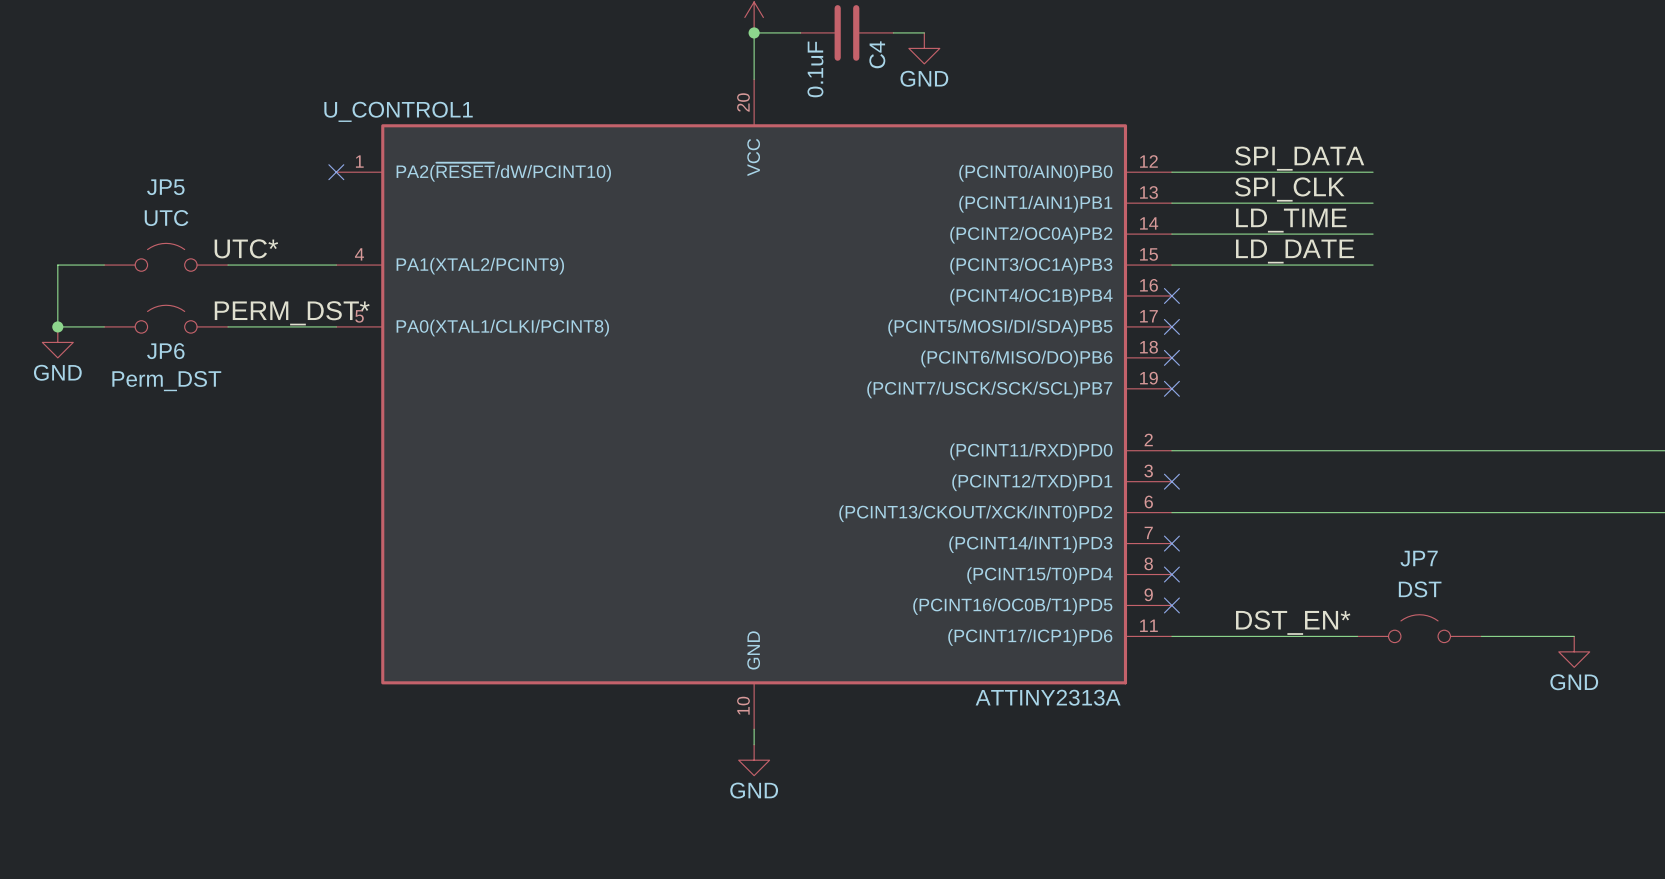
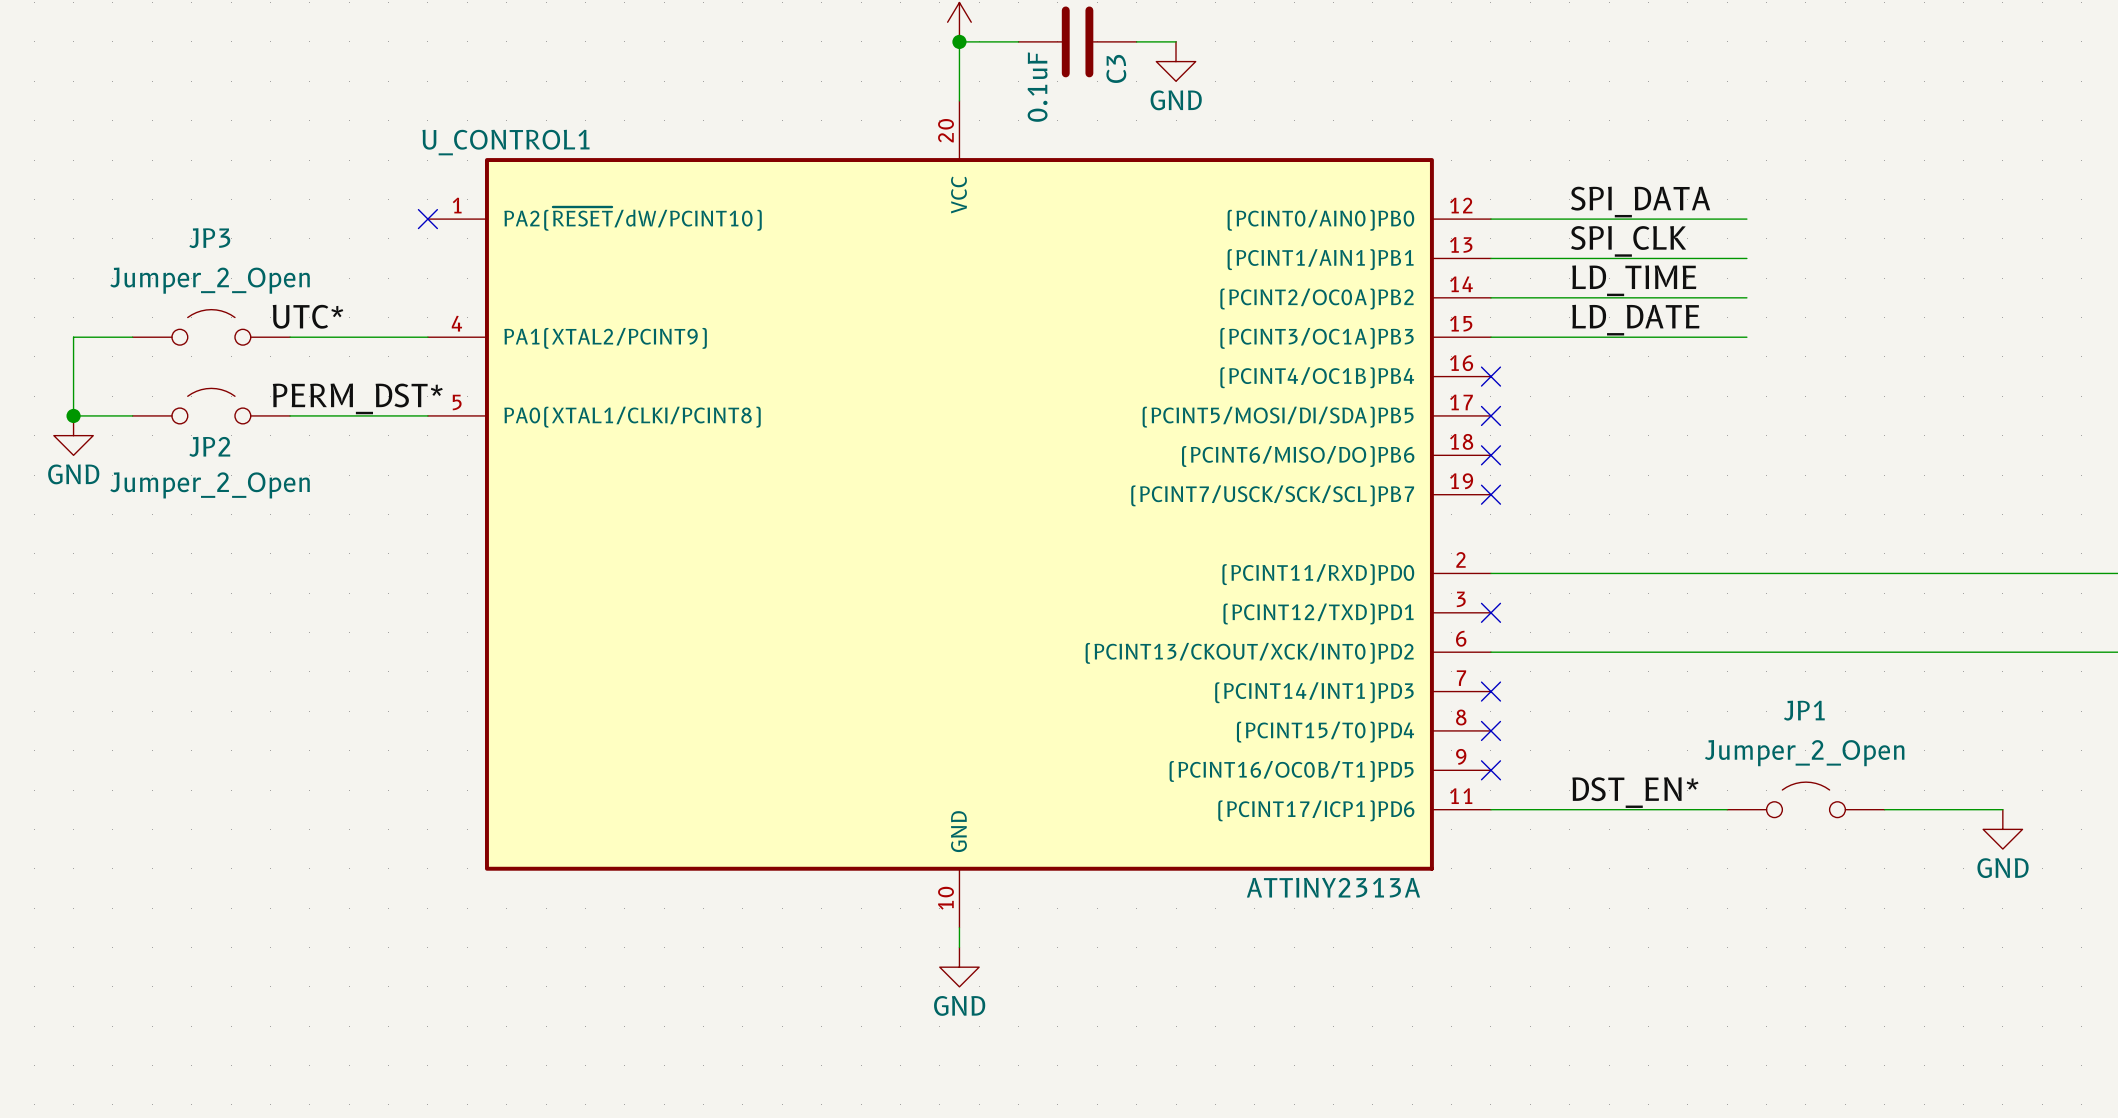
C4 name: C4 (877, 54) -> C3 (1116, 68)
JP5 name: JP5 (165, 187) -> JP3 (209, 238)
JP5 value: UTC (166, 218) -> Jumper_2_Open (210, 280)
JP6 name: JP6 (165, 351) -> JP2 (209, 446)
JP6 value: Perm_DST (166, 381) -> Jumper_2_Open (210, 485)
JP7 name: JP7 (1419, 558) -> JP1 (1804, 710)
JP7 value: DST (1420, 589) -> Jumper_2_Open (1804, 753)

